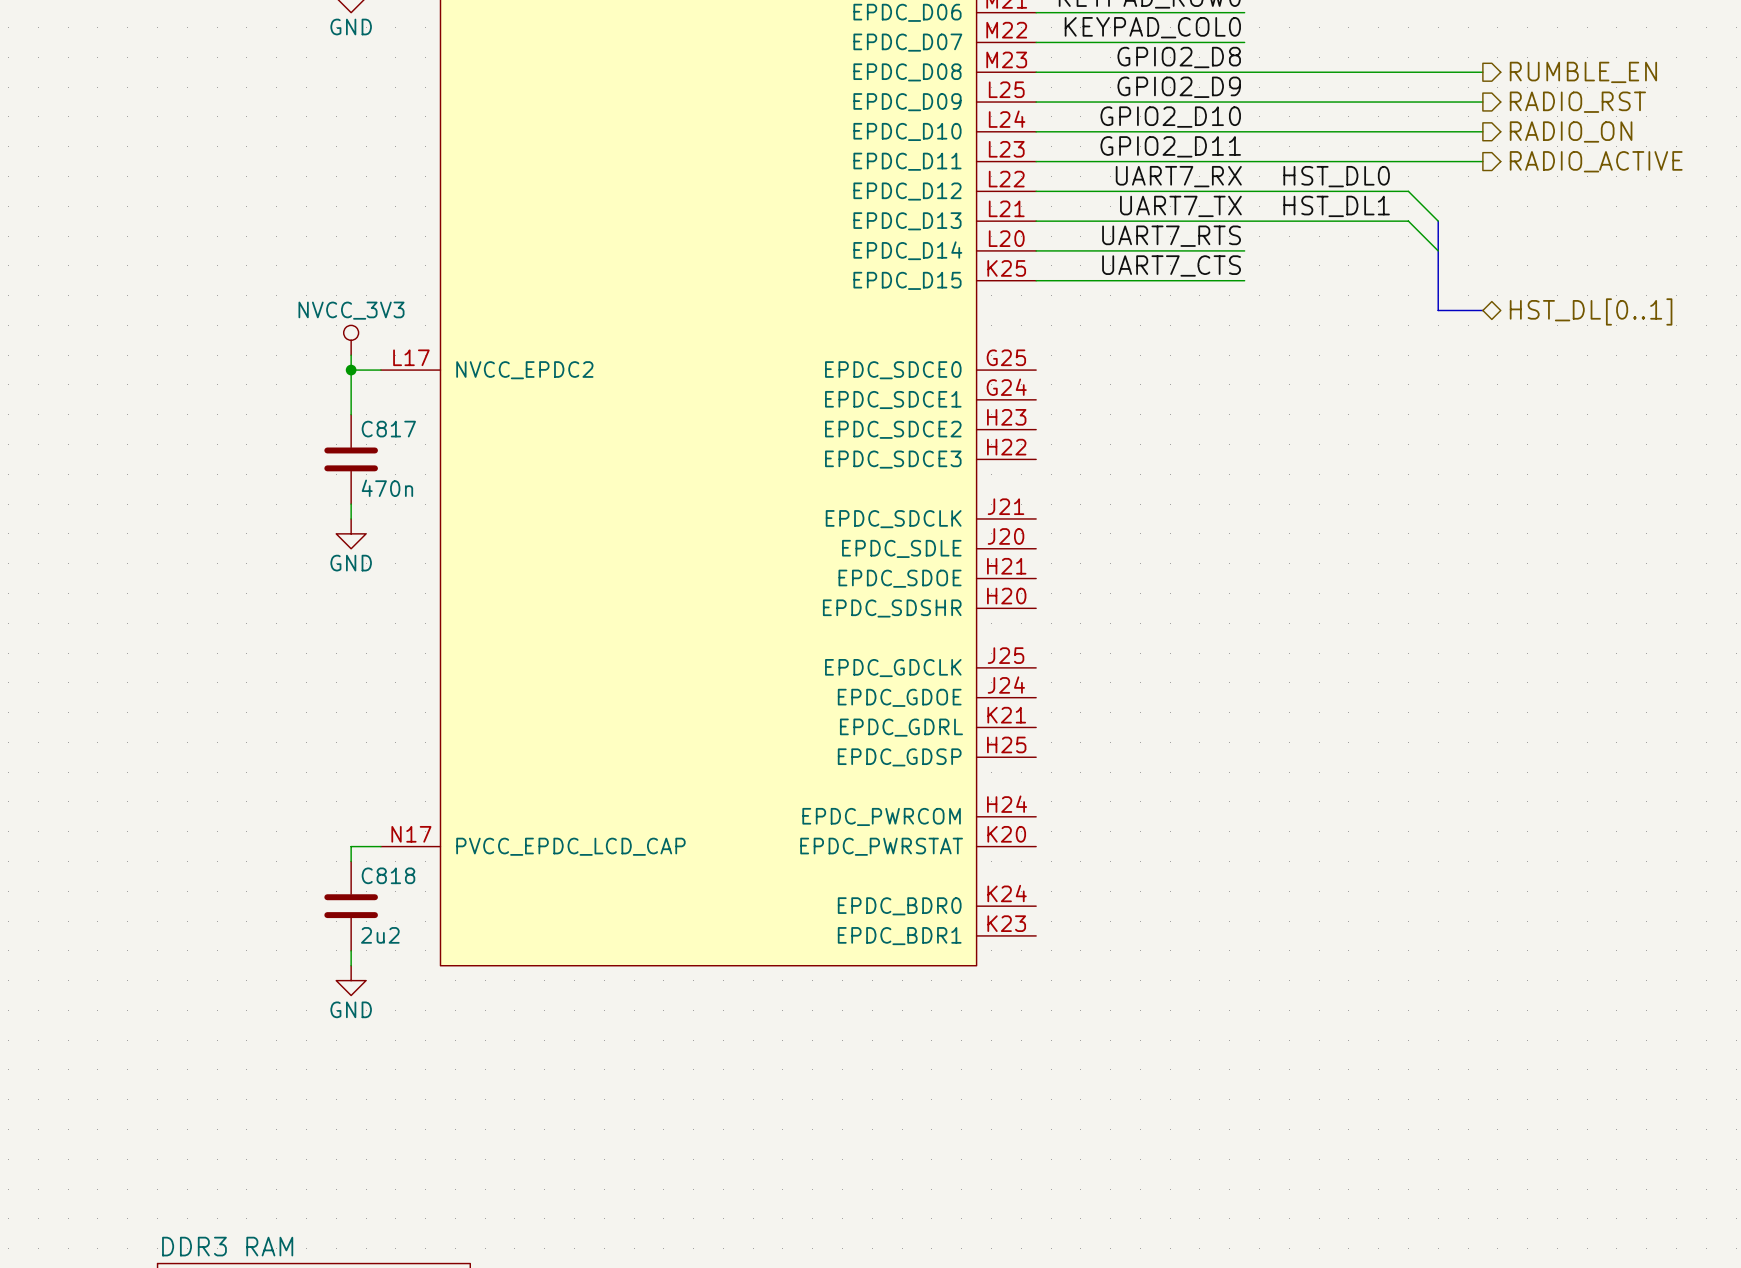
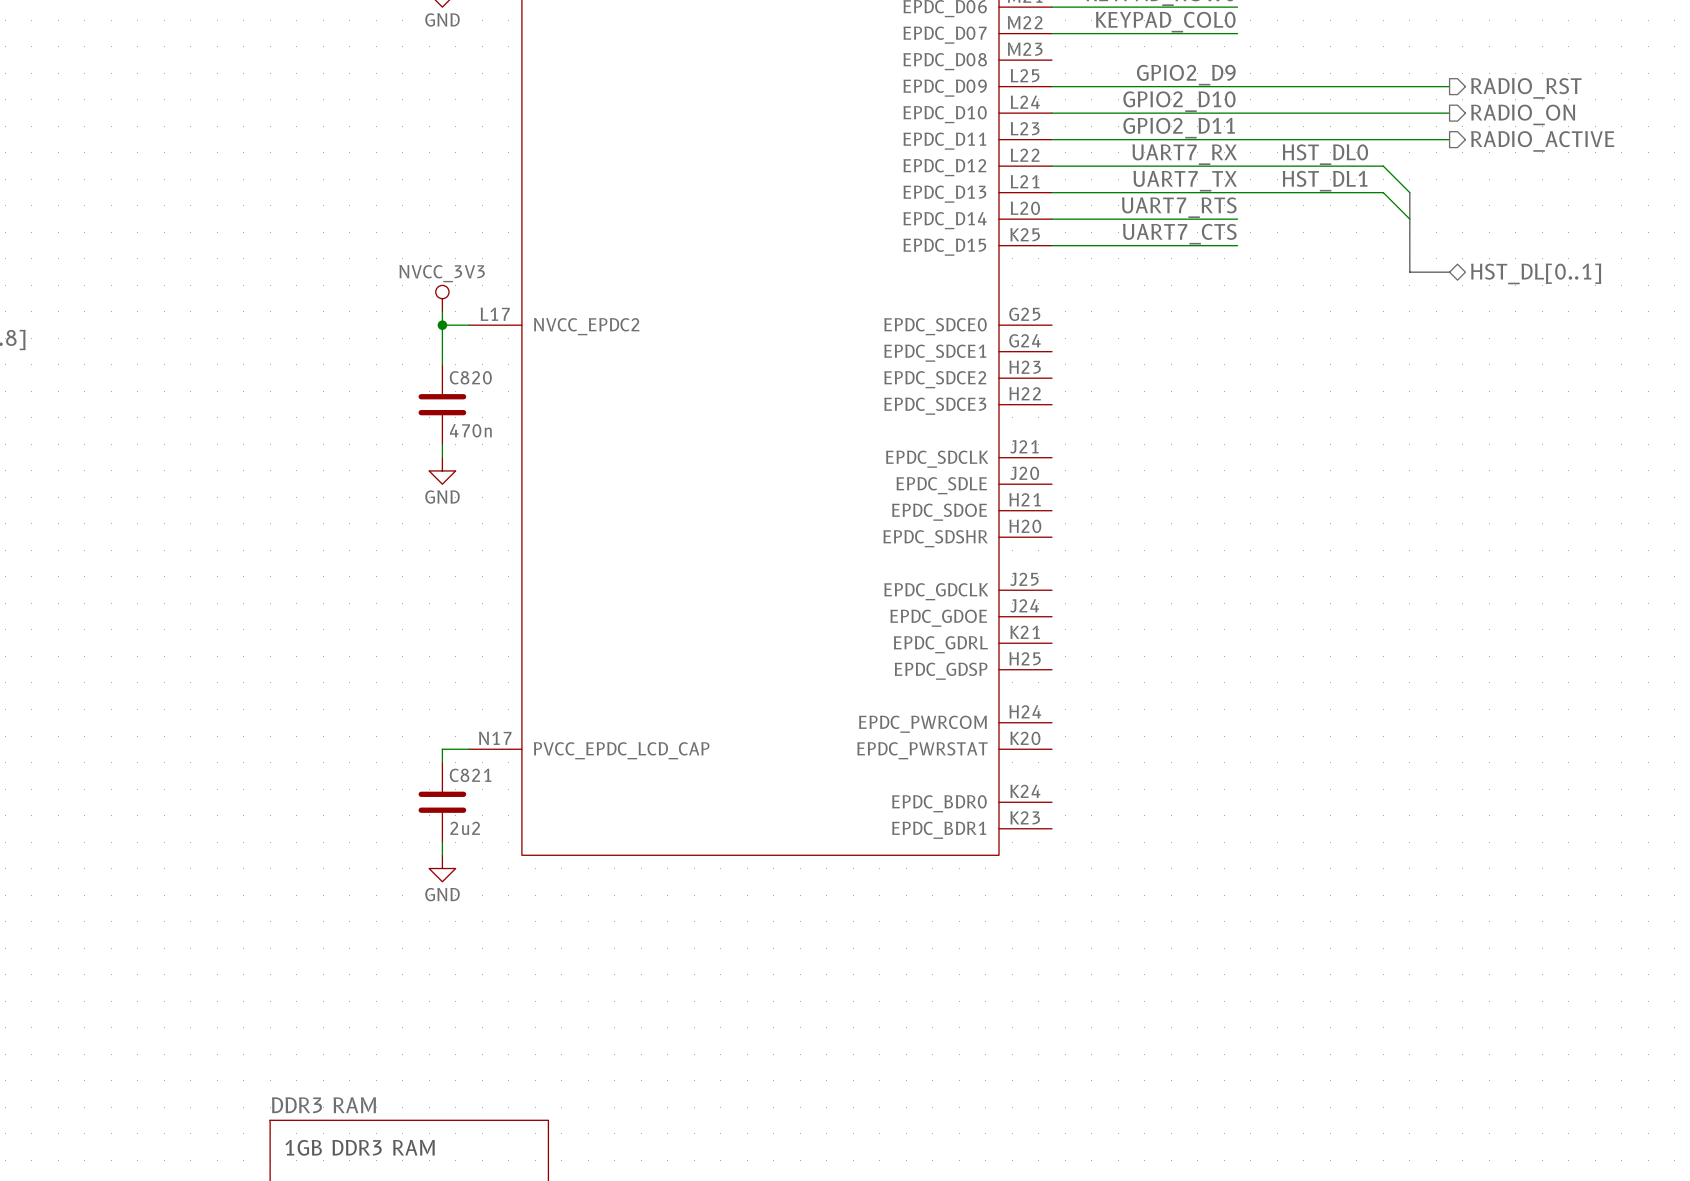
label: GPIO2_D8 (1179, 57) -> none
wire: (1036, 72) (1482, 72) -> none
hierarchical label: RUMBLE_EN (1583, 72) -> none
C817 name: C817 (388, 429) -> C820 (470, 377)
C818 name: C818 (388, 875) -> C821 (470, 775)

